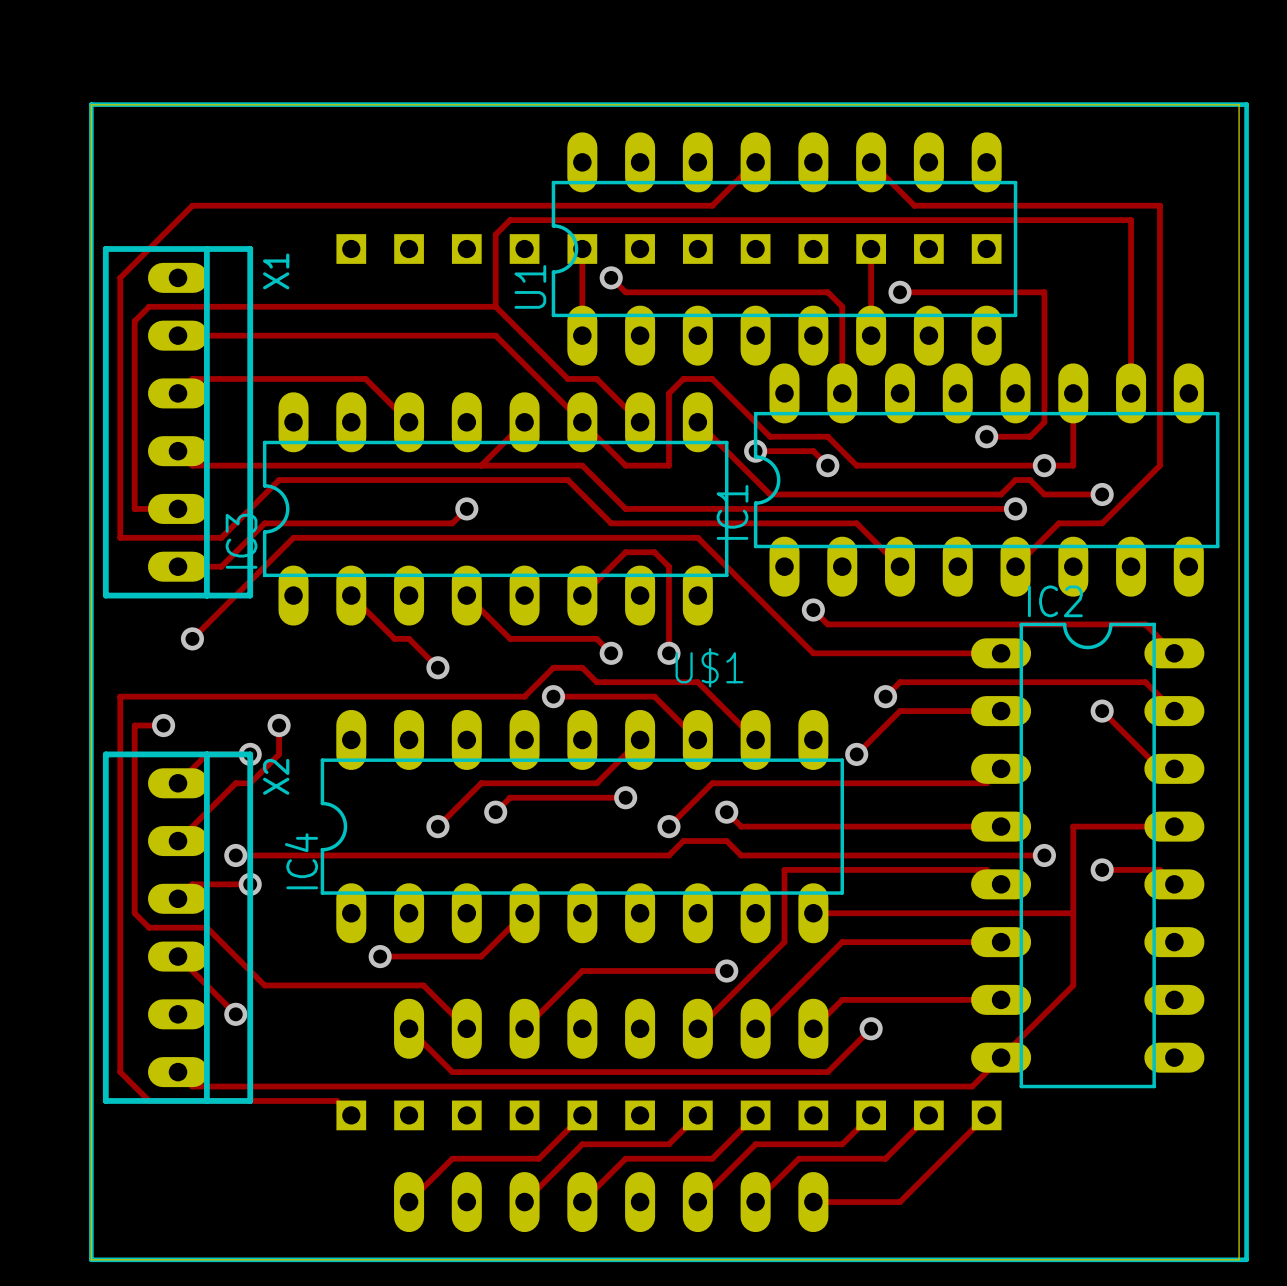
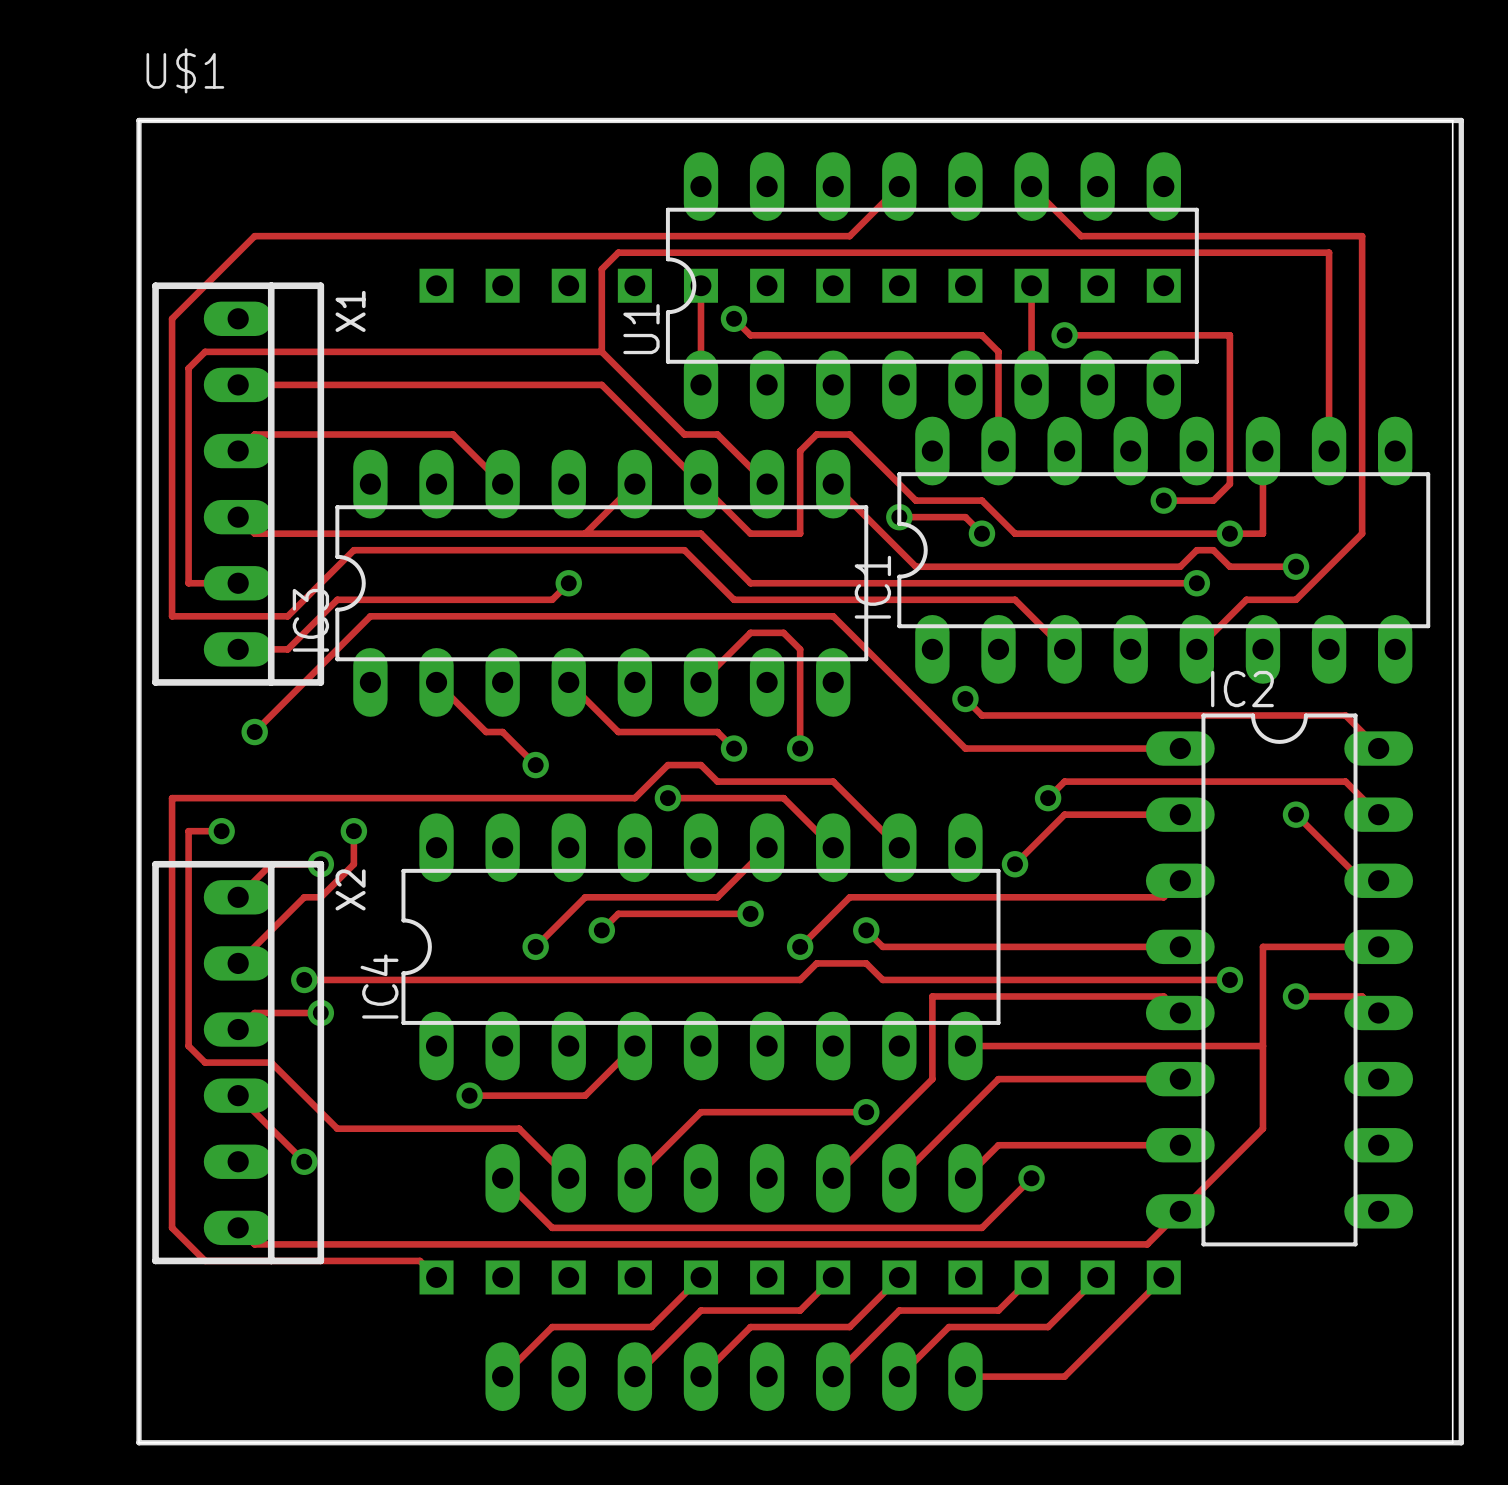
U$1 name position: U$1 (709, 667) -> U$1 (185, 70)

